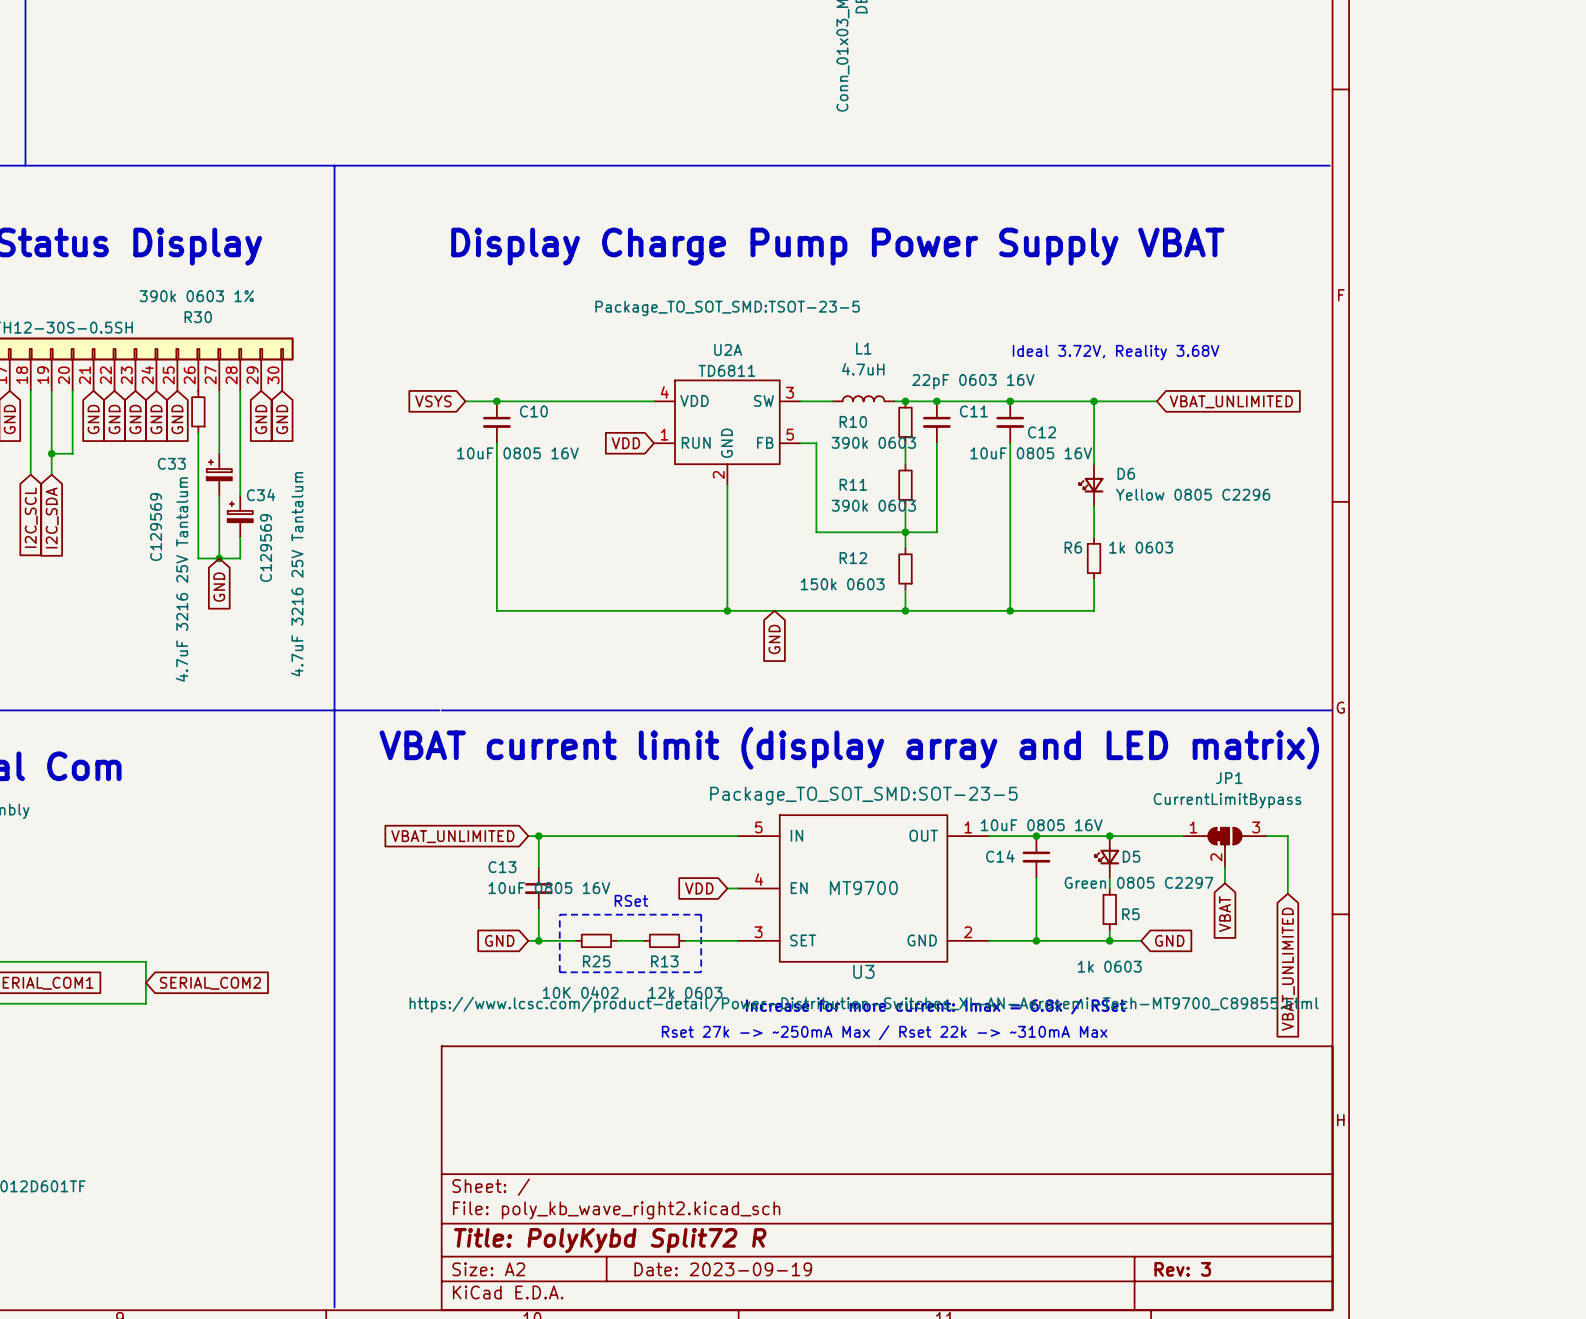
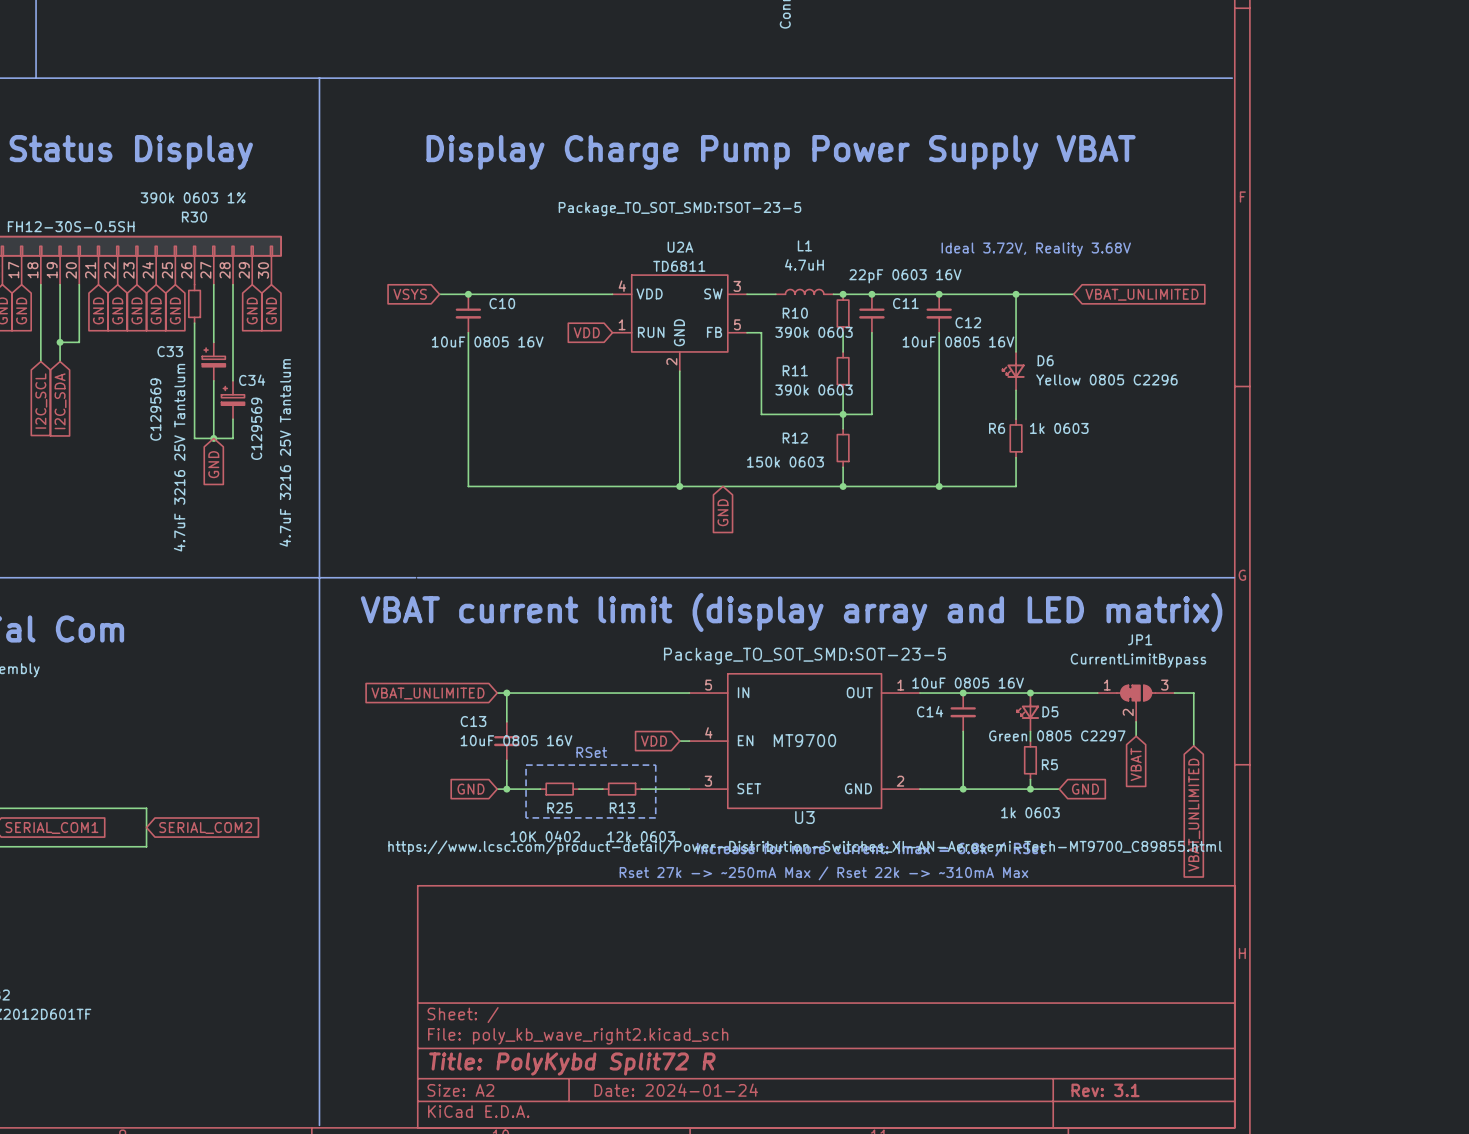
title block: Date: 2023-09-19 (723, 1269) -> Date: 2024-01-24 (676, 1090)
title block: Rev: 3 (1182, 1269) -> Rev: 3.1 (1105, 1090)

